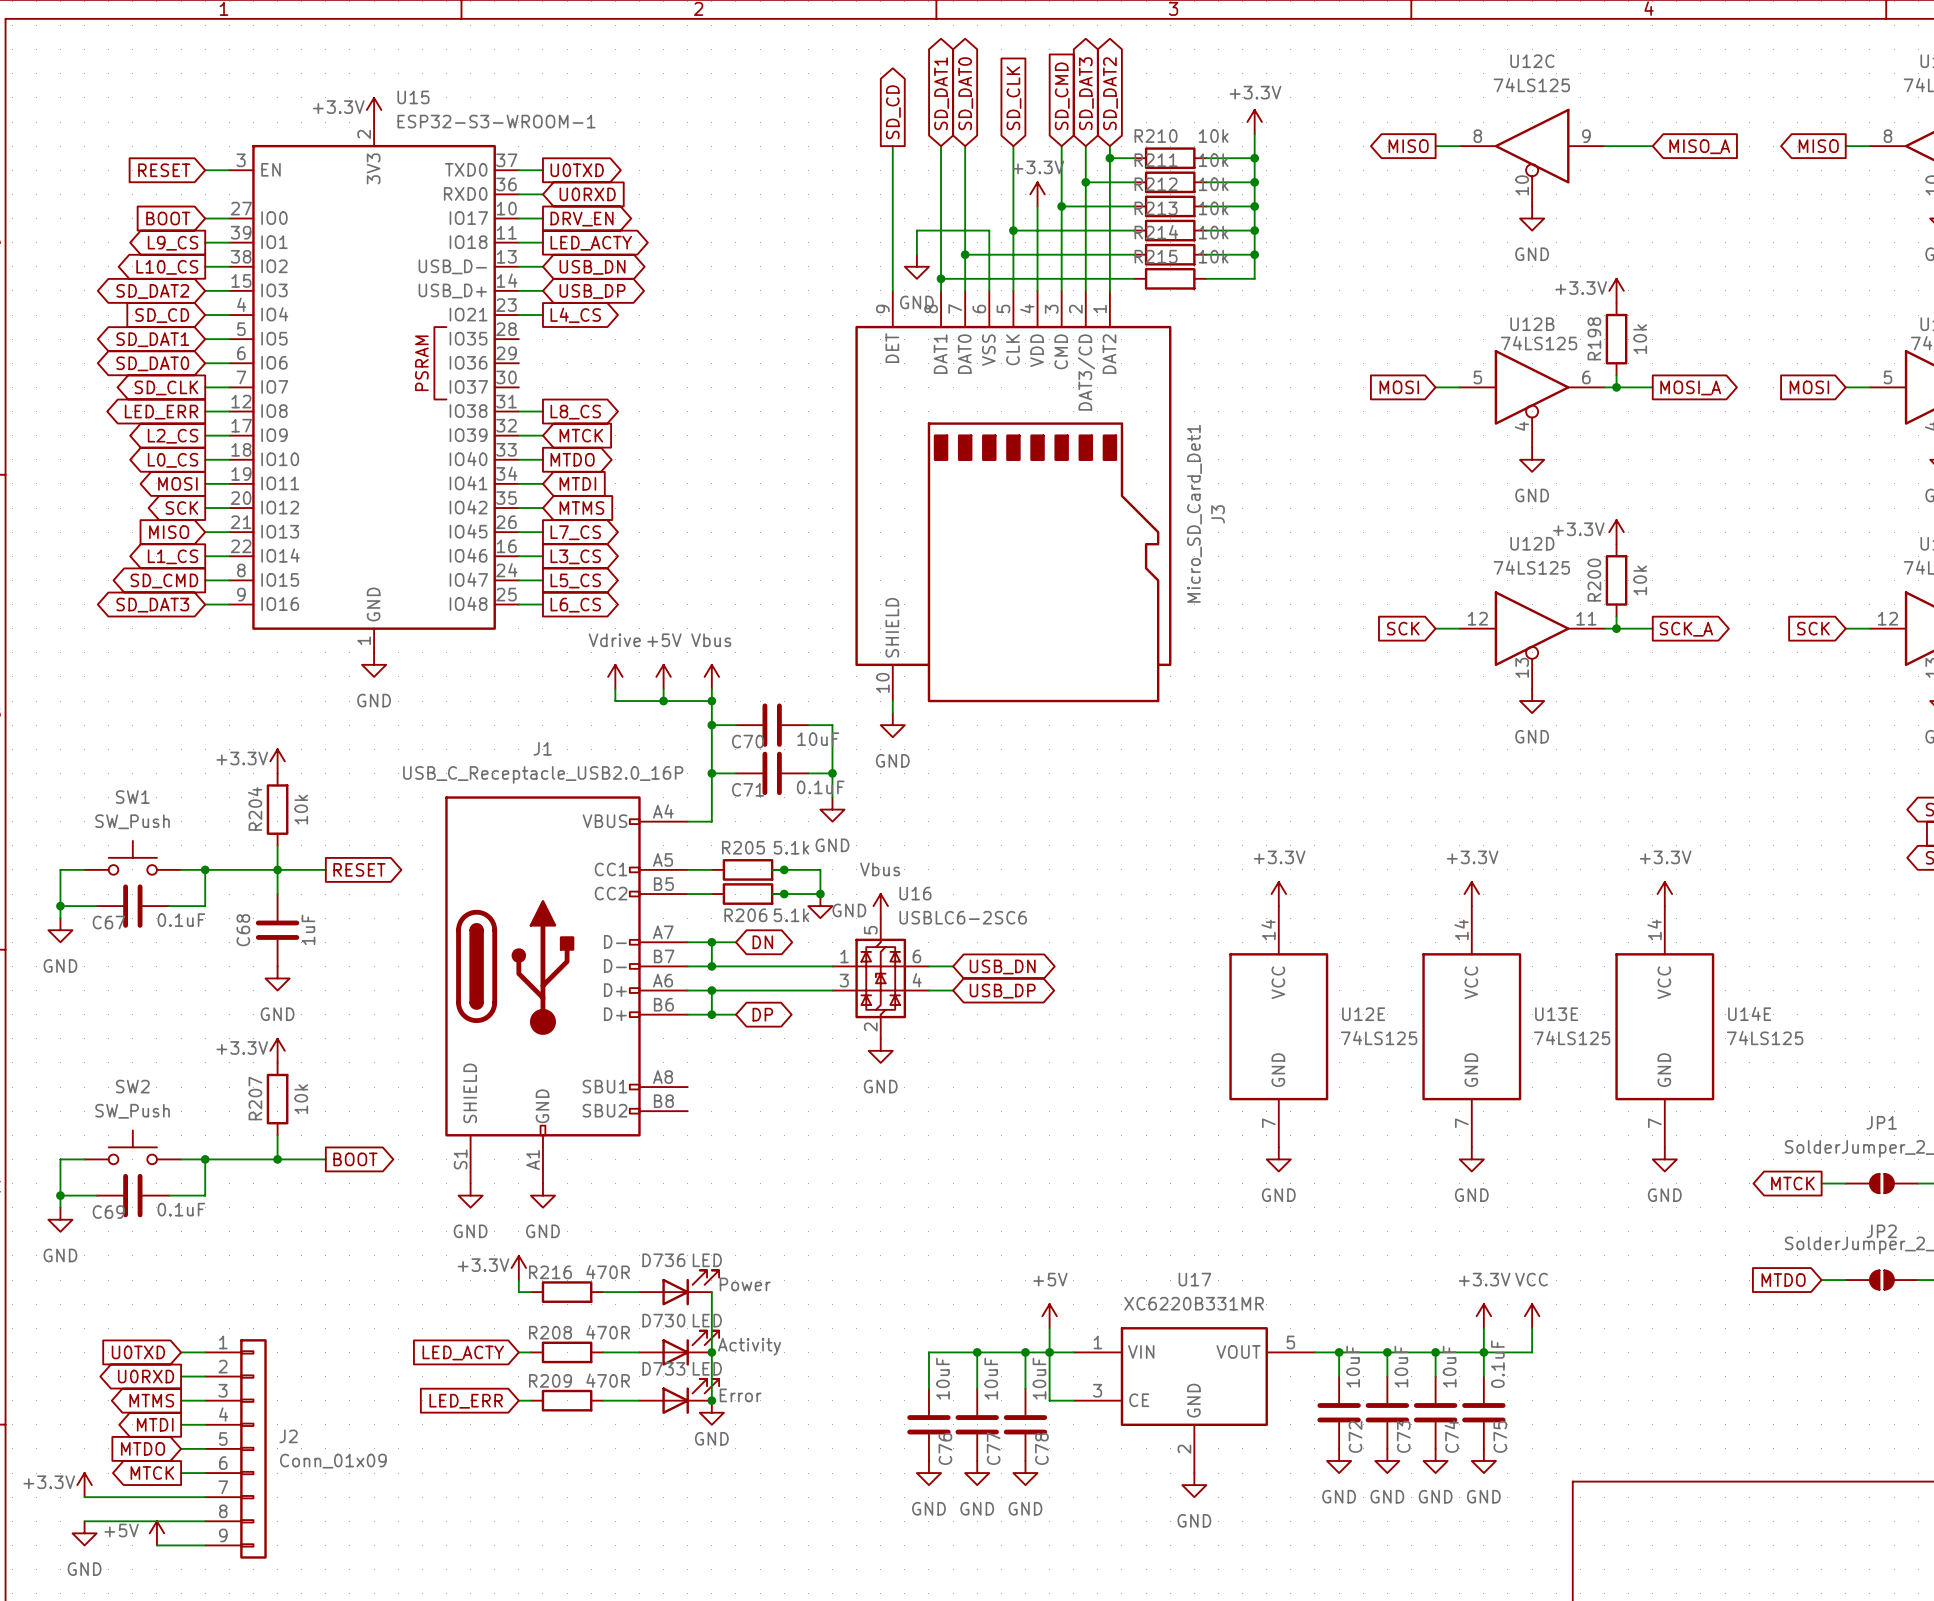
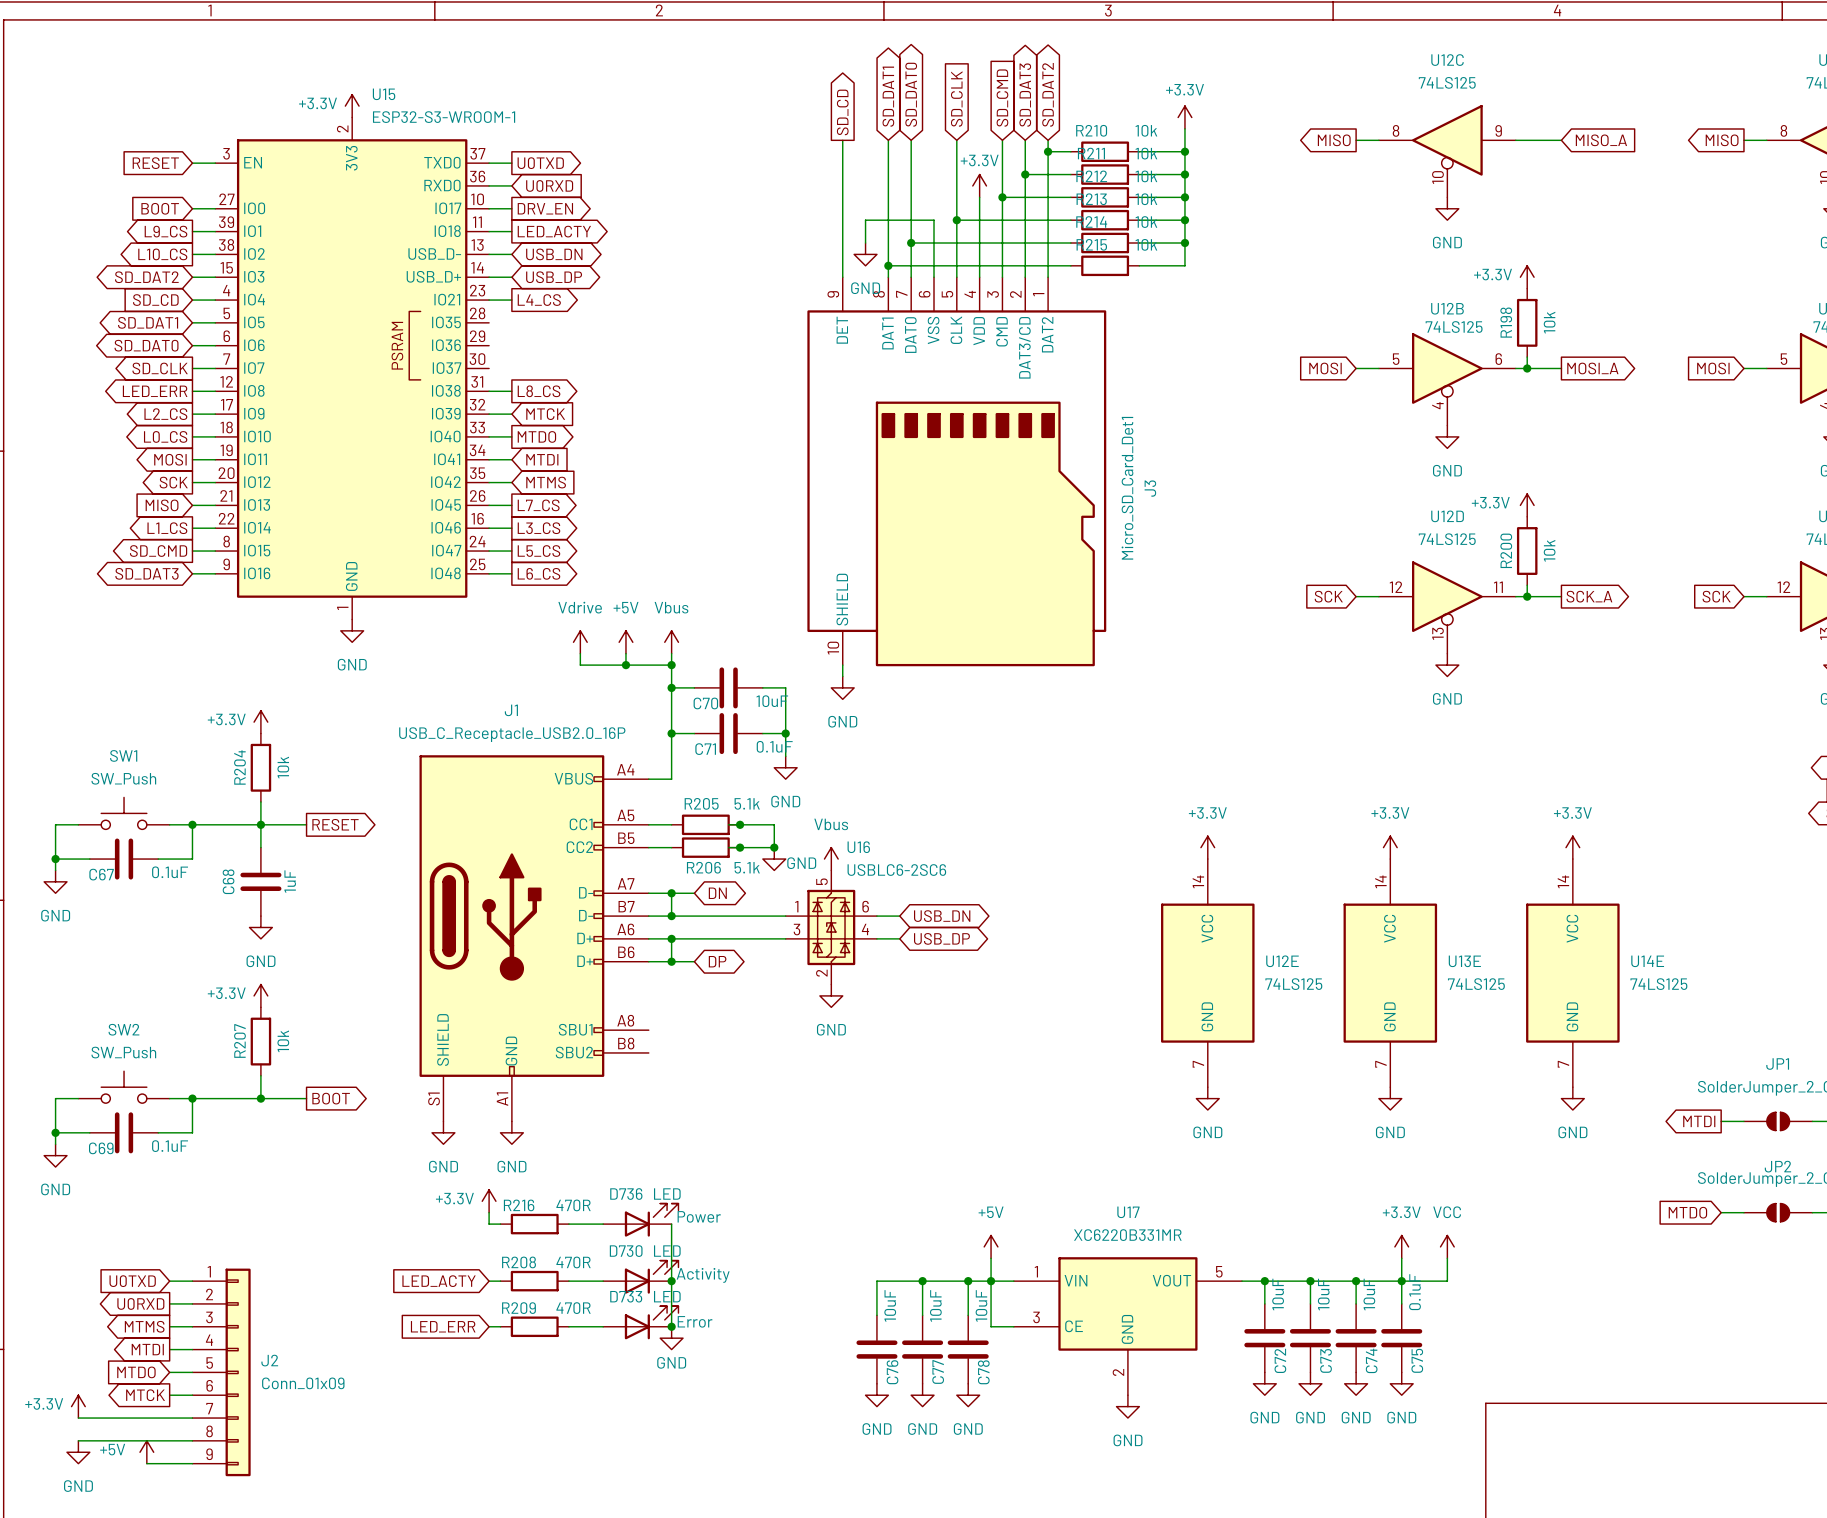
global label: MTCK (1792, 1183) -> MTDI (1699, 1121)

